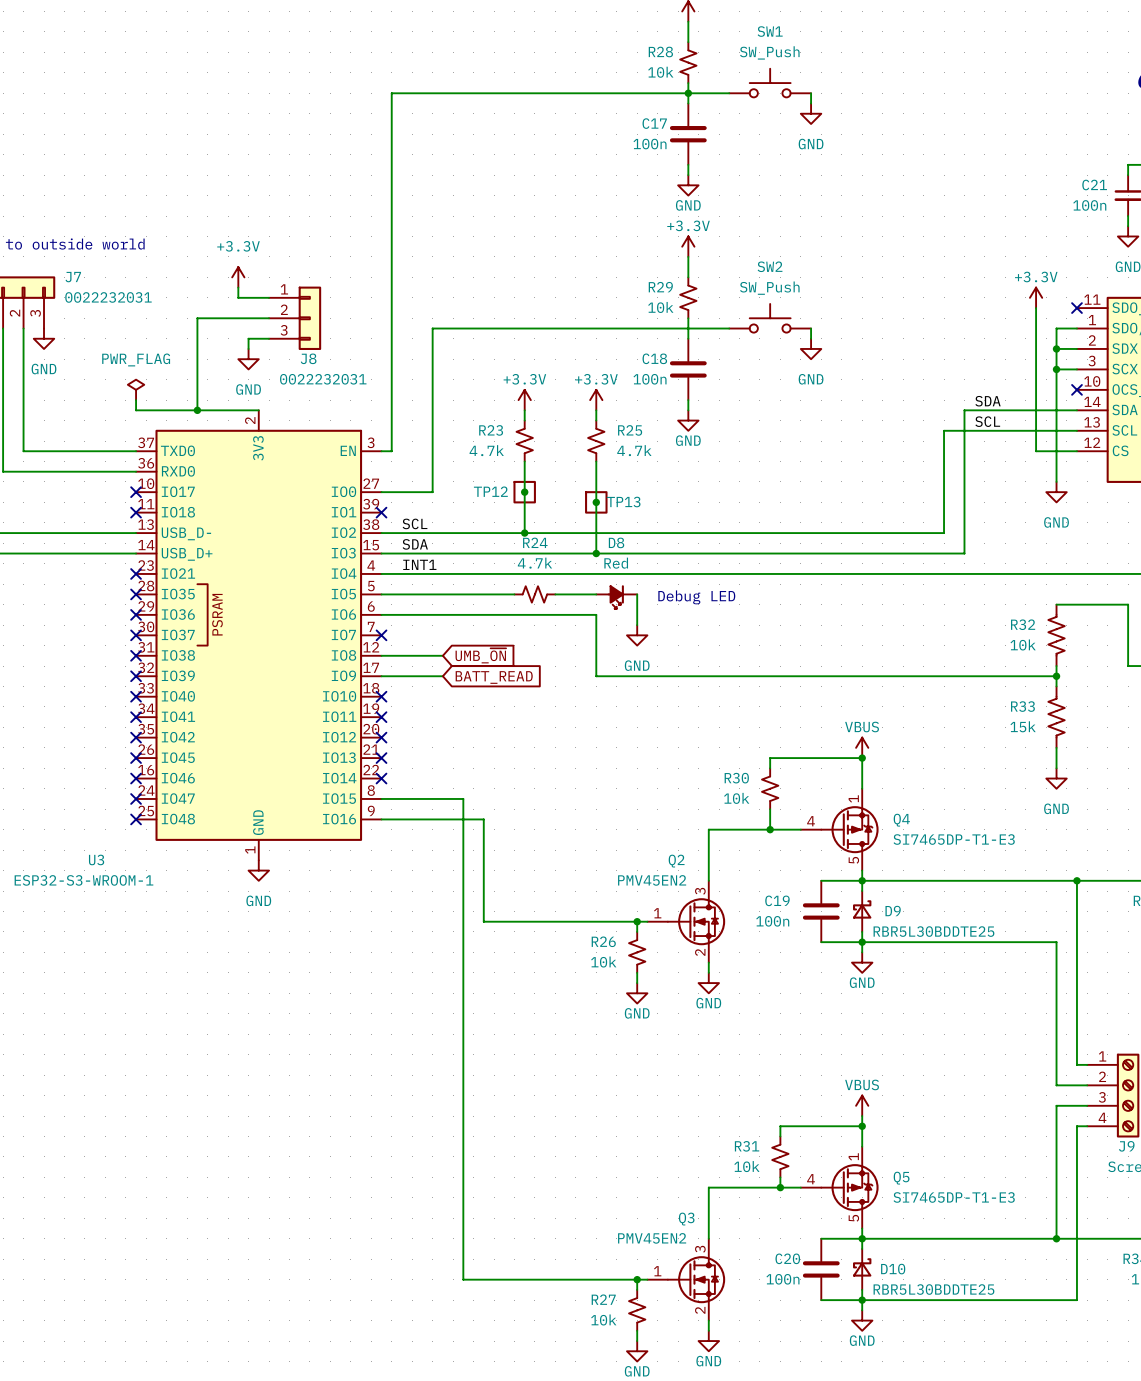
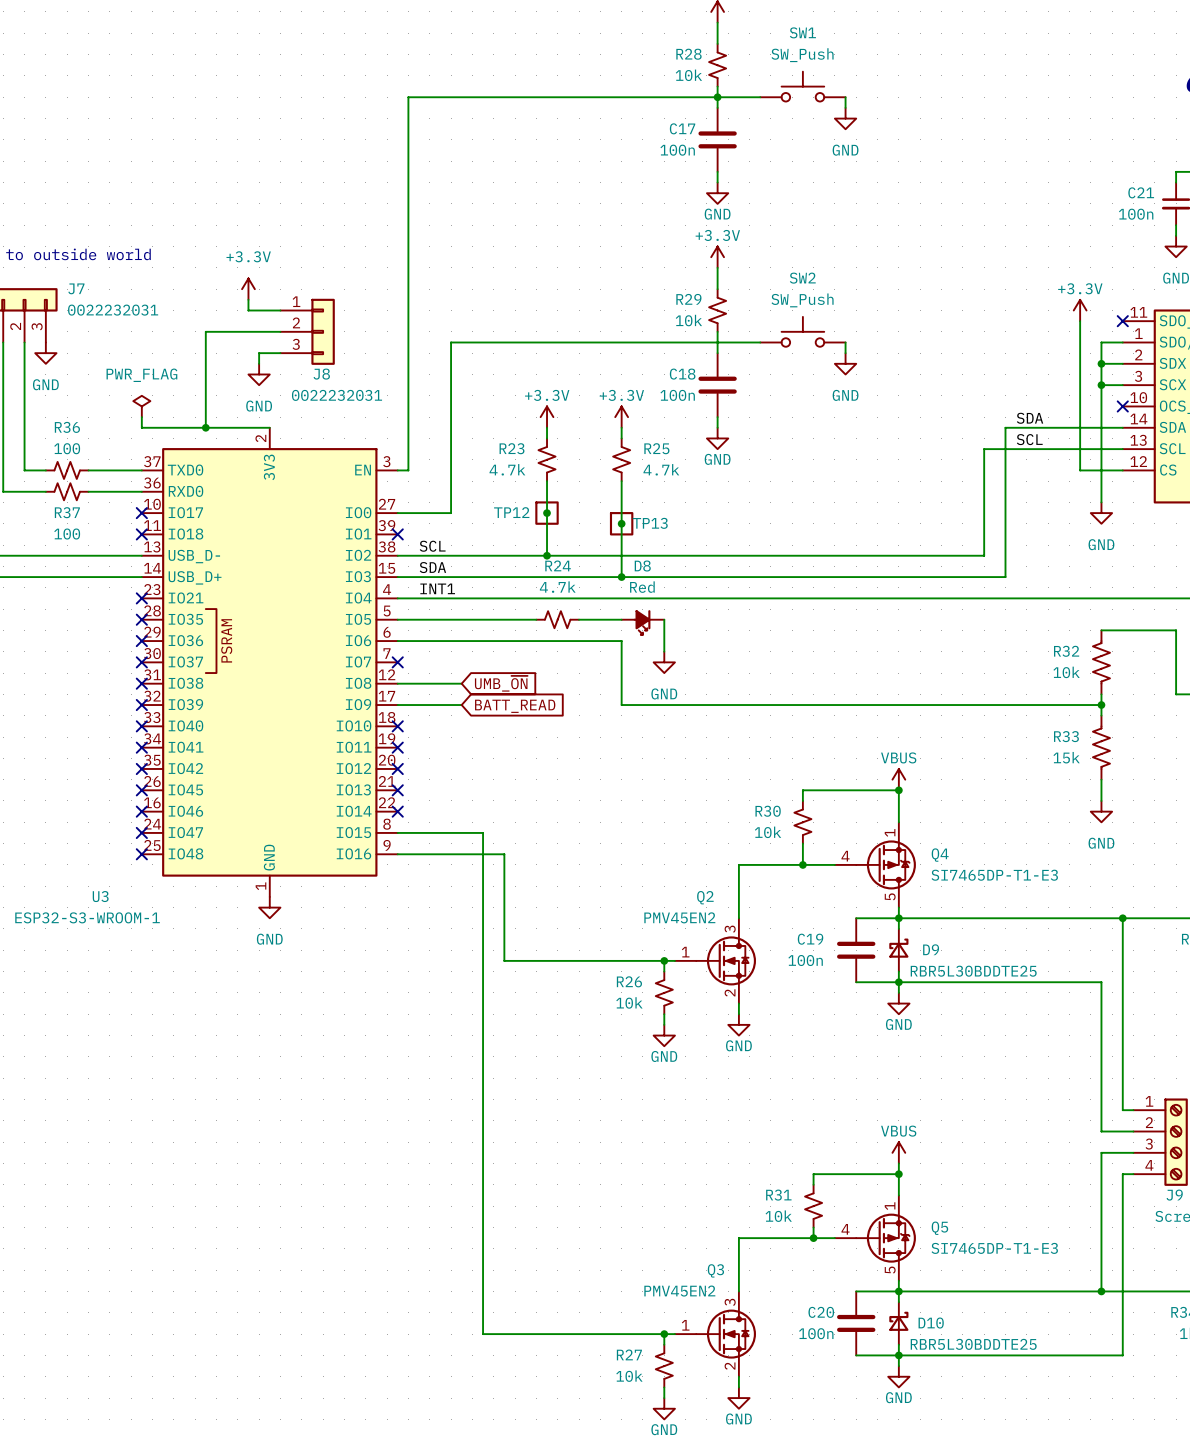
R36: none -> 100 (67, 470)
R37: none -> 100 (67, 491)
text: Debug LED (696, 597) -> none

